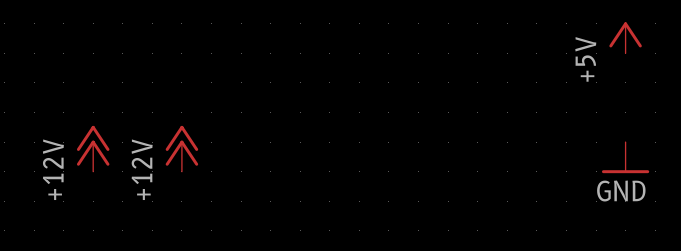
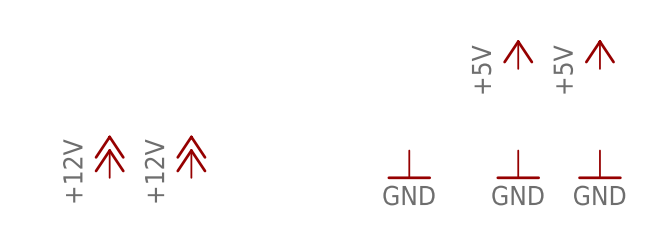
power symbol: none -> +5V (518, 54)
power symbol: none -> GND (409, 164)
power symbol: none -> GND (518, 164)

